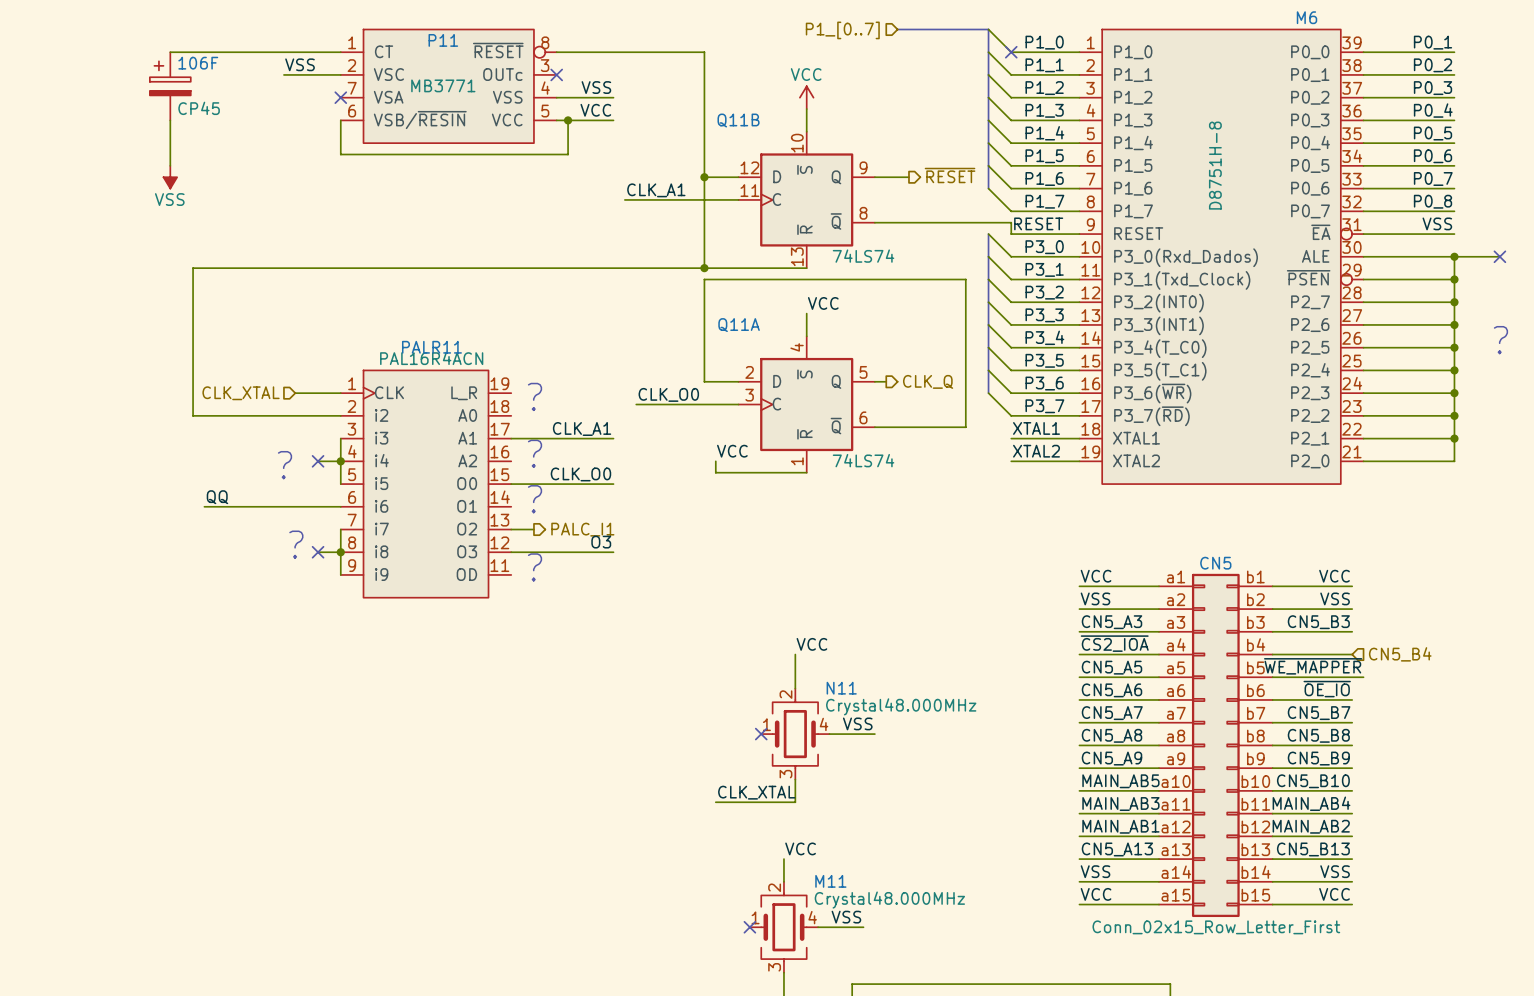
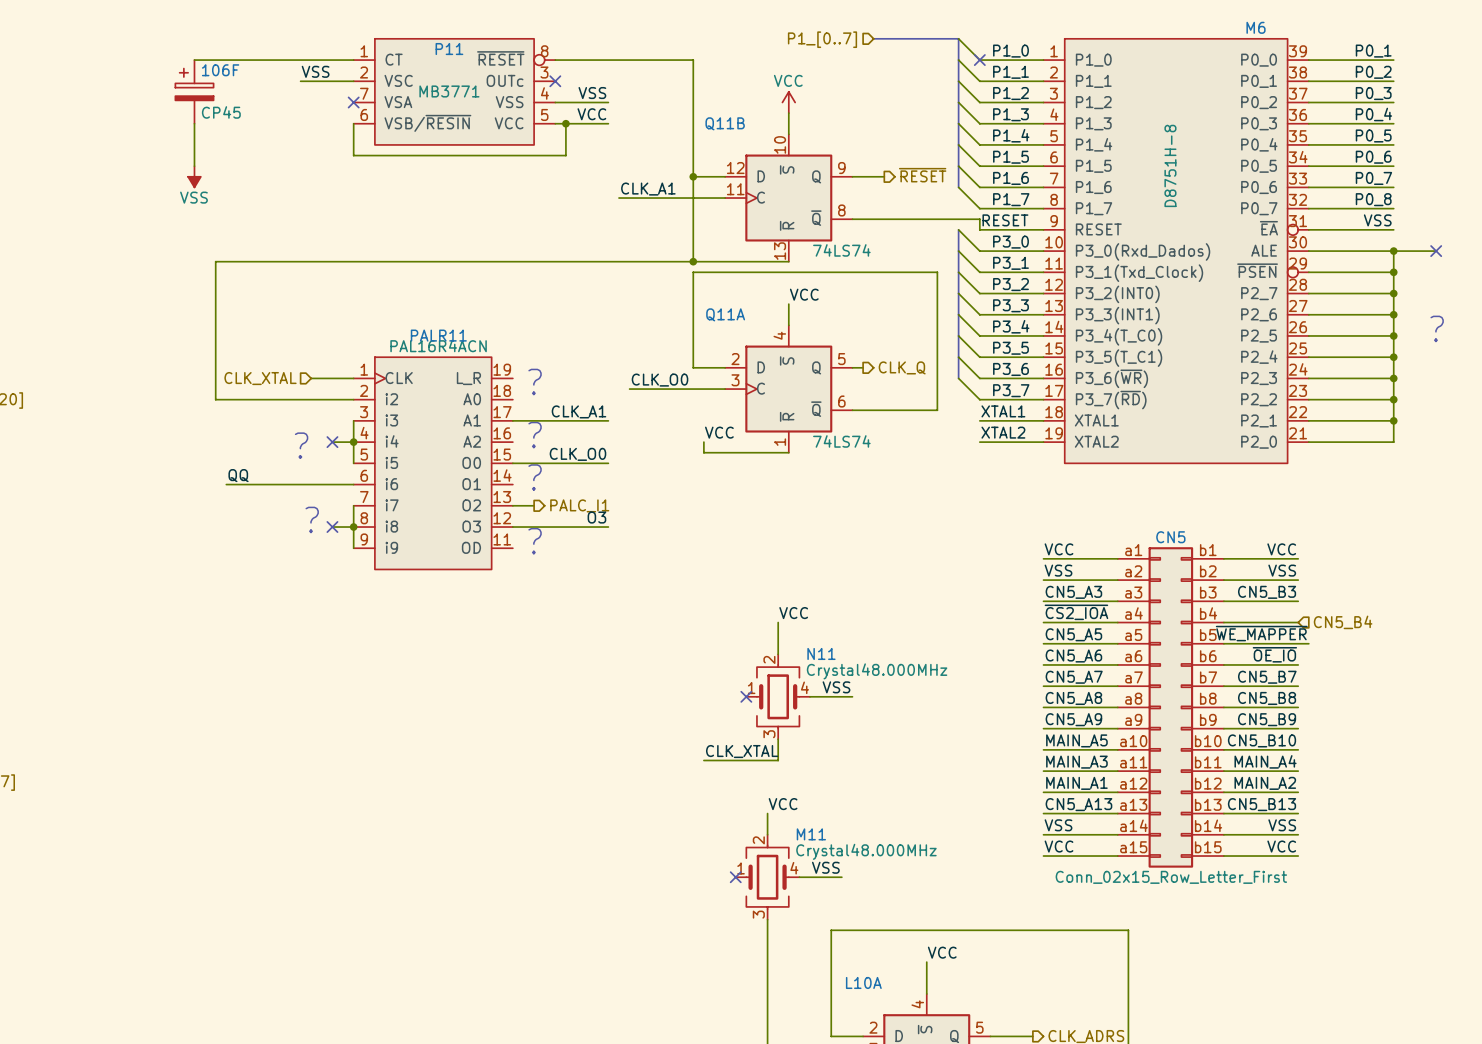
label: MAIN_AB5 (1120, 781) -> MAIN_A5 (1076, 740)
label: MAIN_AB4 (1311, 803) -> MAIN_A4 (1265, 761)
label: MAIN_AB3 (1120, 804) -> MAIN_A3 (1076, 762)
label: MAIN_AB1 (1120, 826) -> MAIN_A1 (1076, 783)
label: MAIN_AB2 (1311, 826) -> MAIN_A2 (1265, 783)

